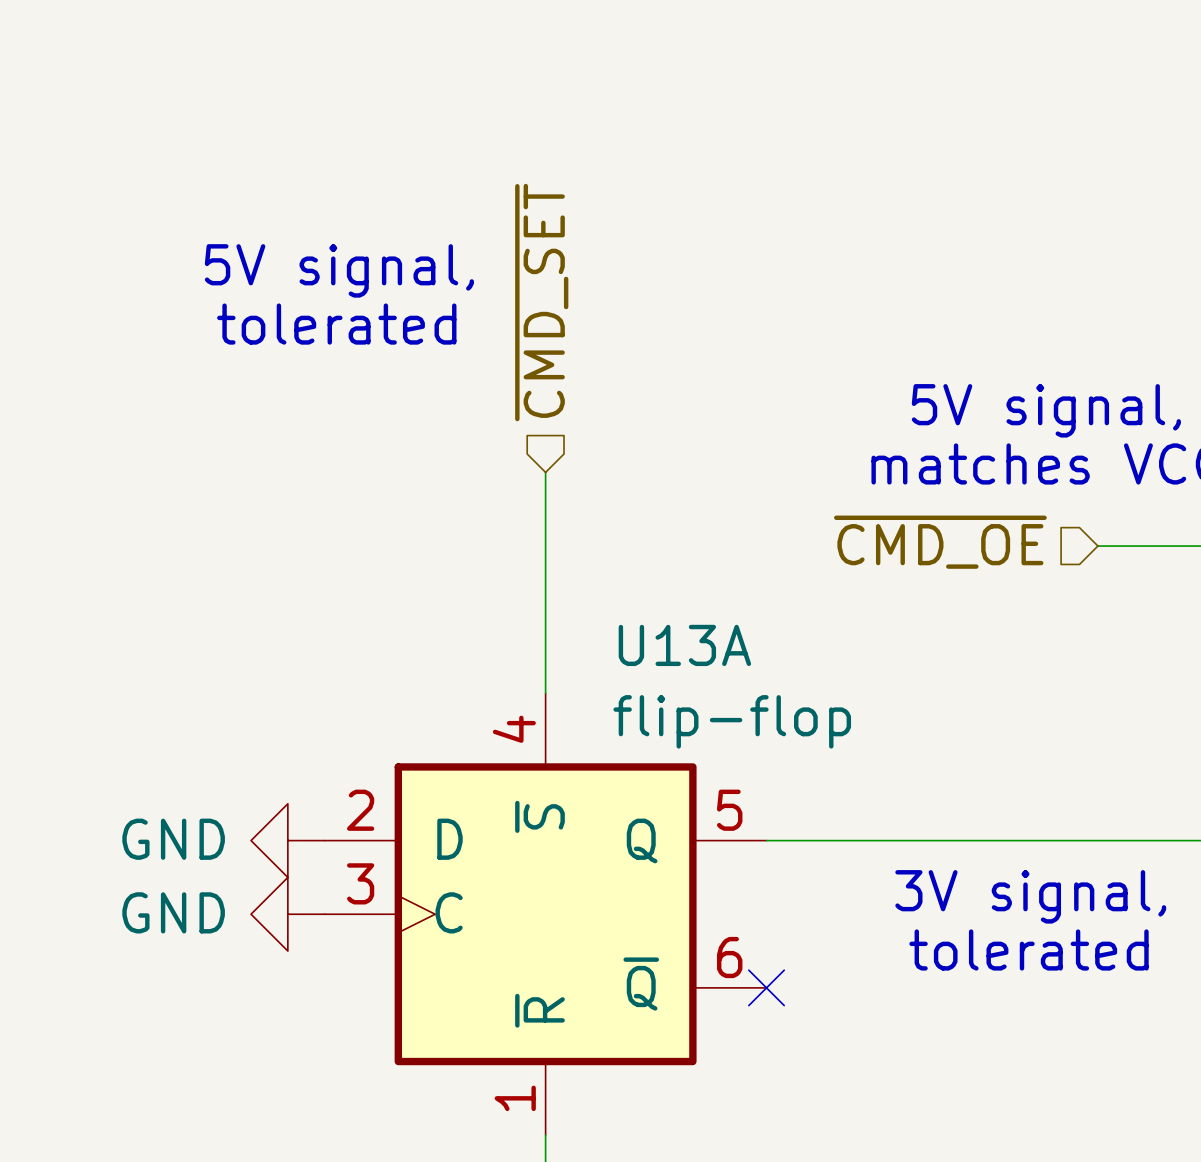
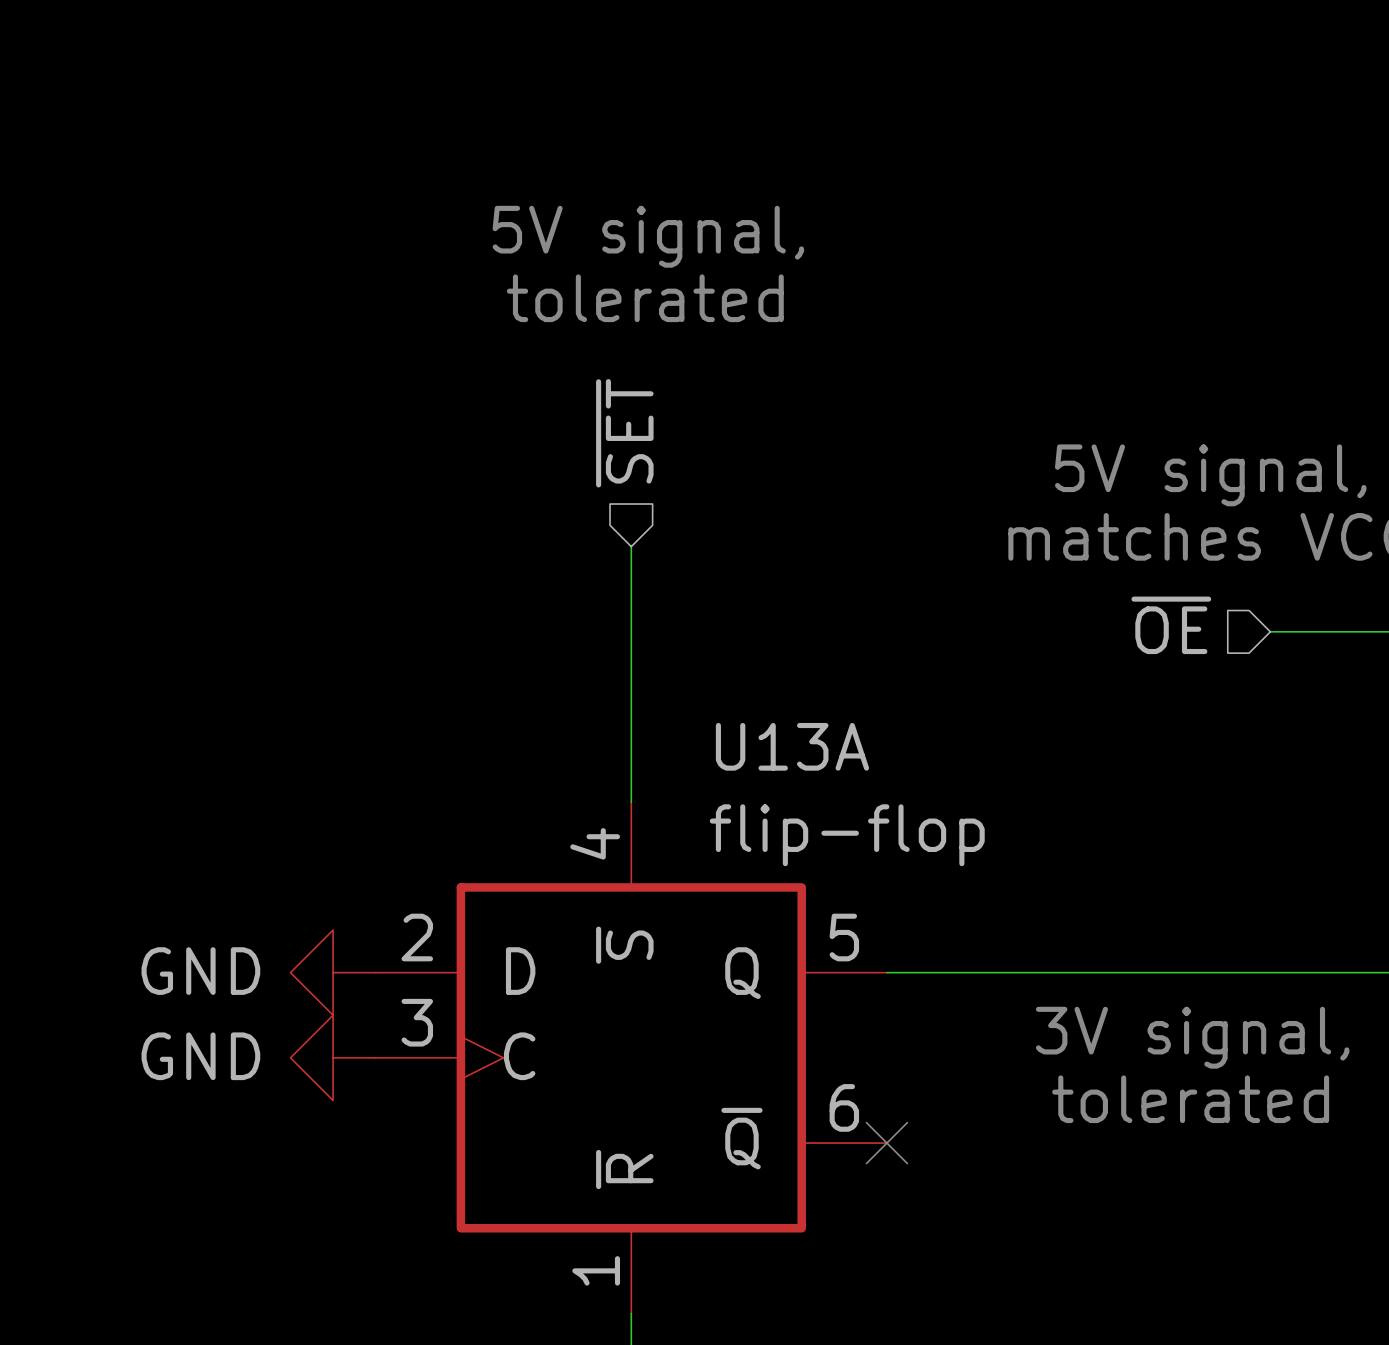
text position: 5V signal, (339, 270) -> 5V signal, (648, 236)
hierarchical label: ~{CMD_SET} (541, 302) -> ~{SET} (624, 433)
text position: tolerated (336, 324) -> tolerated (645, 298)
hierarchical label: ~{CMD_OE} (940, 542) -> ~{OE} (1171, 625)

